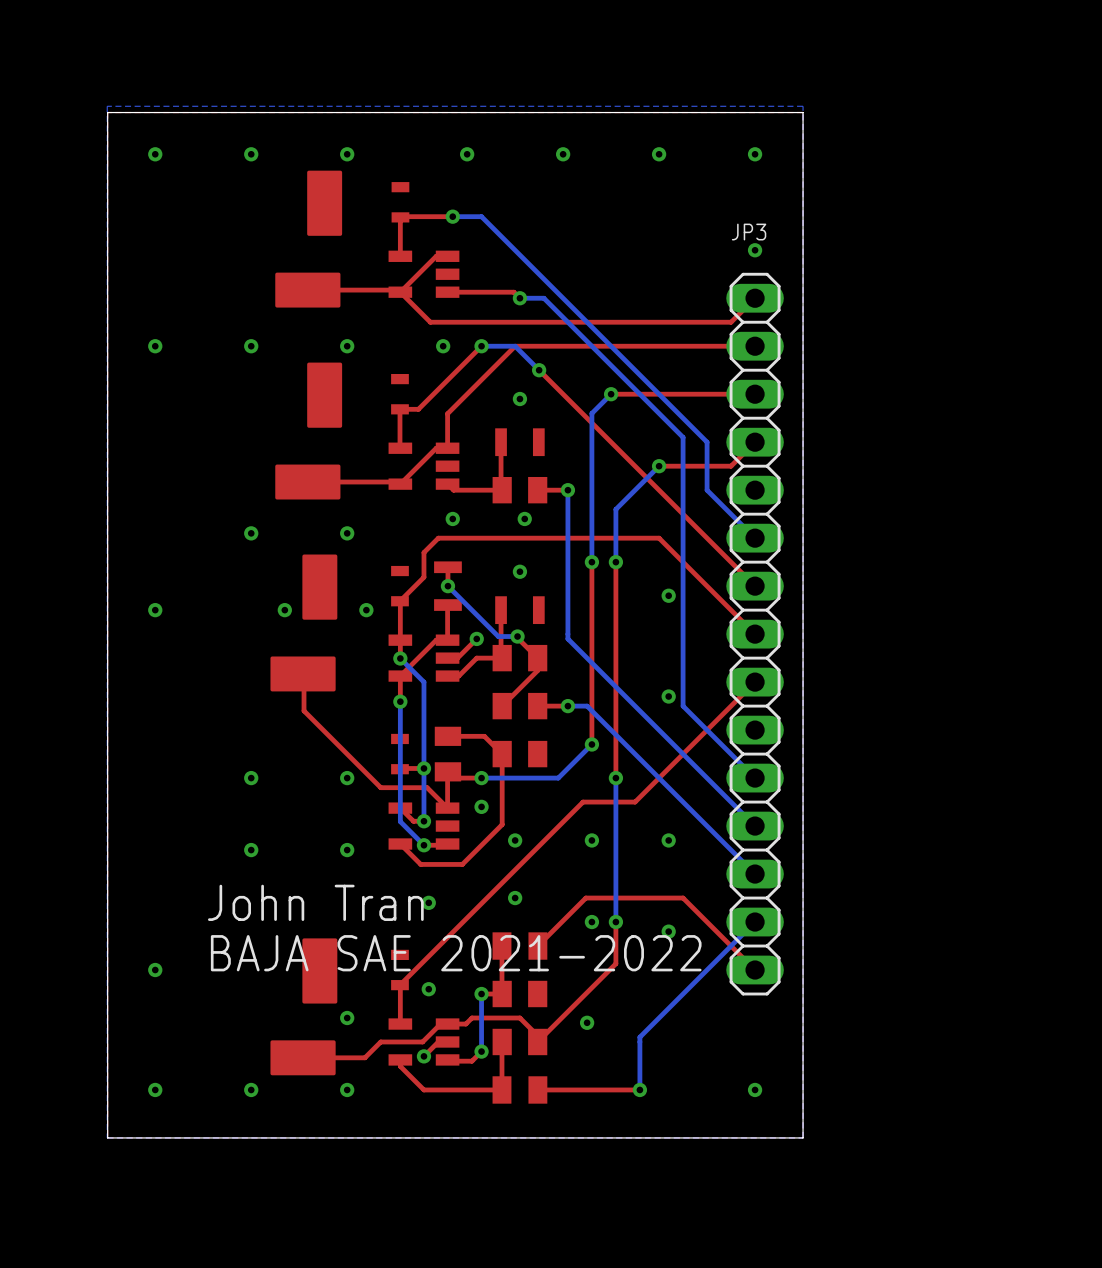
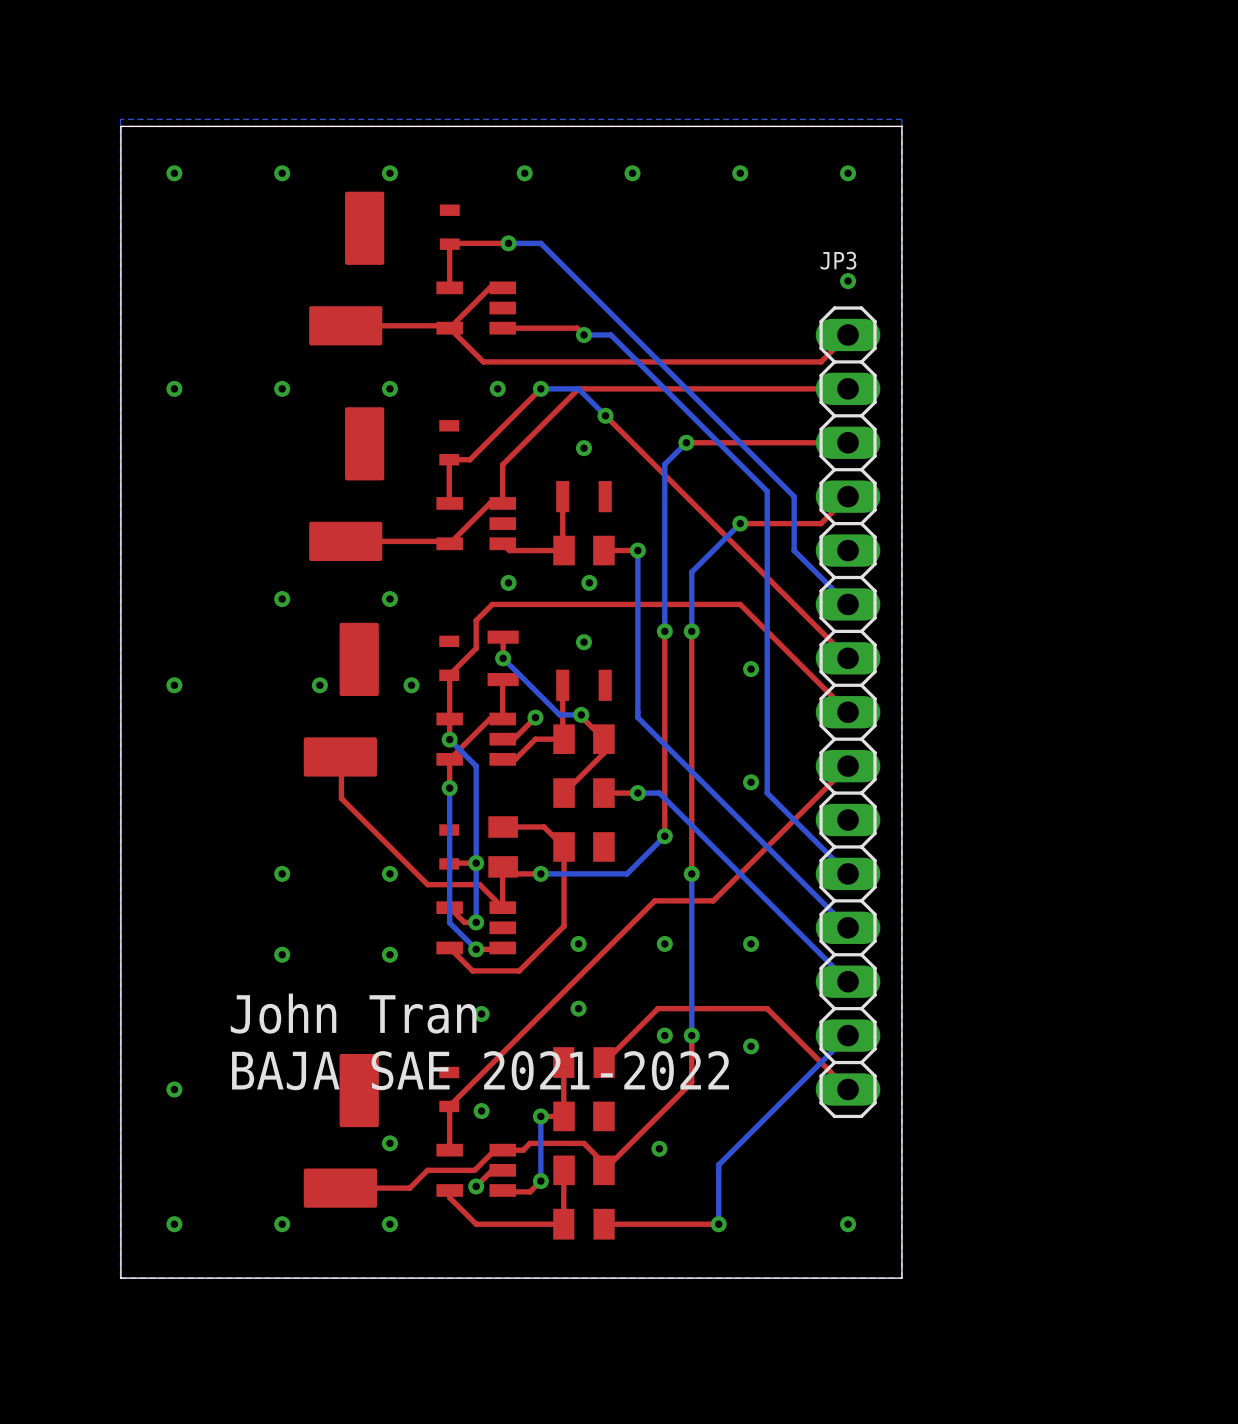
via: (481, 806) -> none

